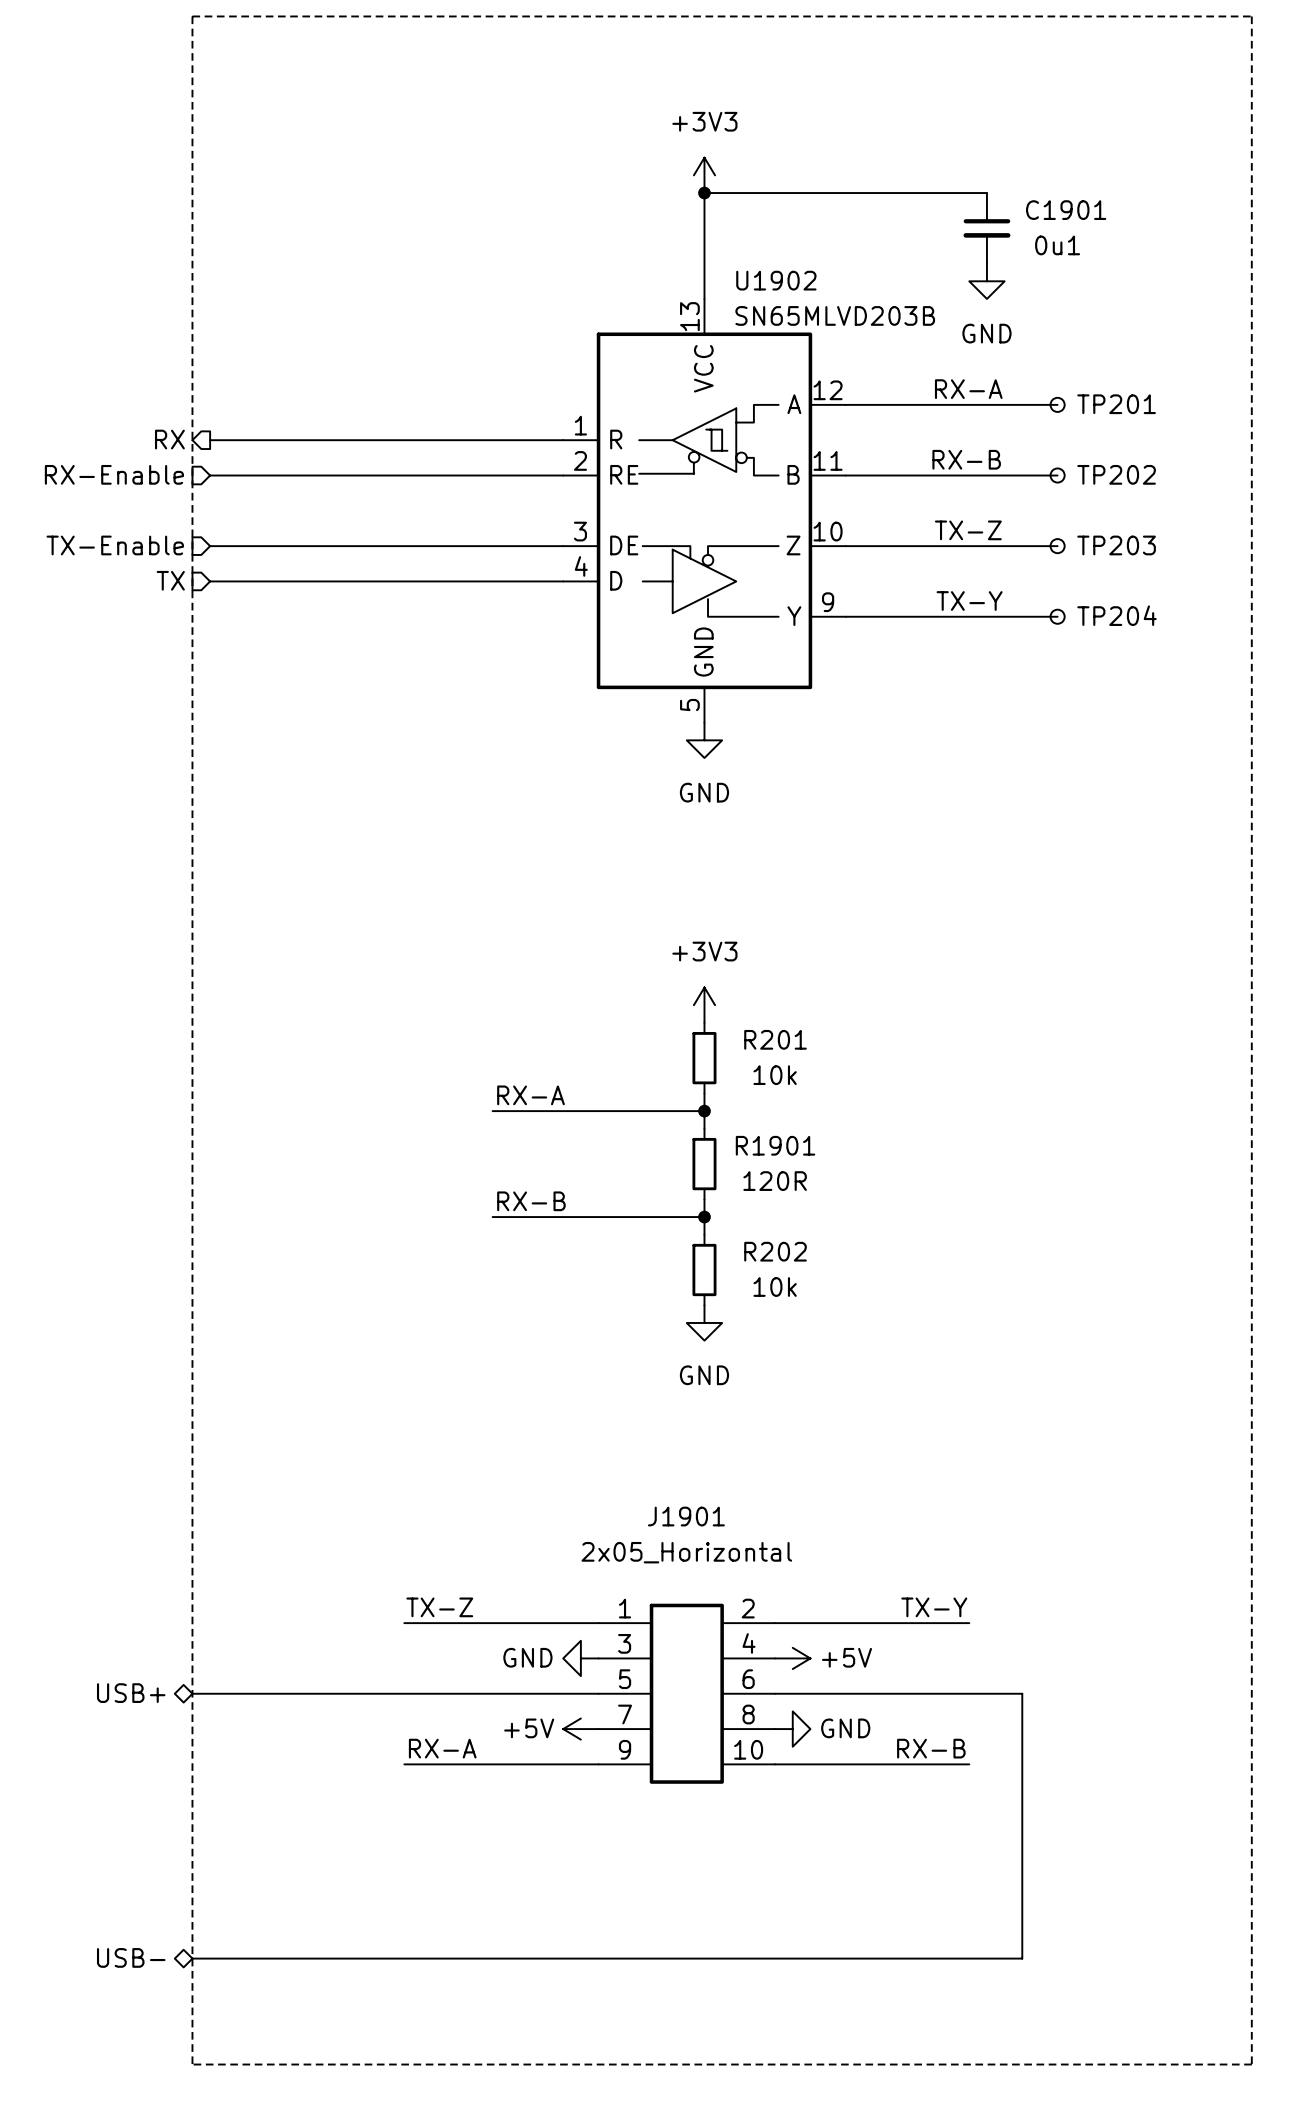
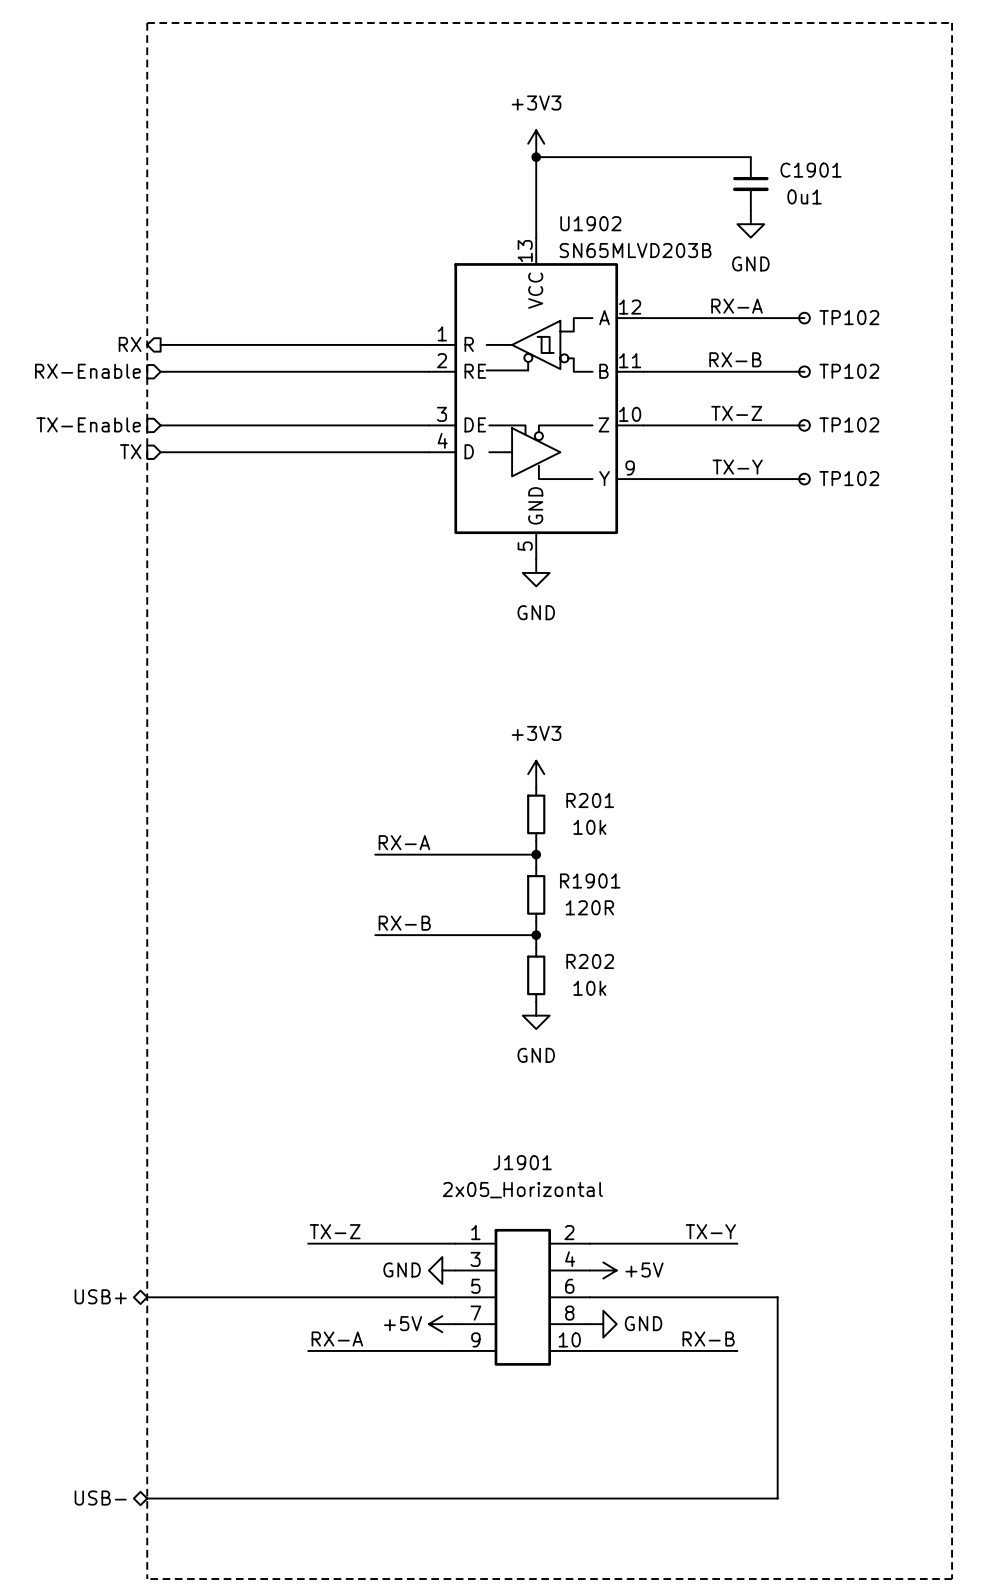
TP201 name: TP201 (1116, 404) -> TP102 (849, 317)
TP202 name: TP202 (1116, 474) -> TP102 (849, 371)
TP203 name: TP203 (1116, 545) -> TP102 (849, 424)
TP204 name: TP204 (1117, 615) -> TP102 (849, 478)

